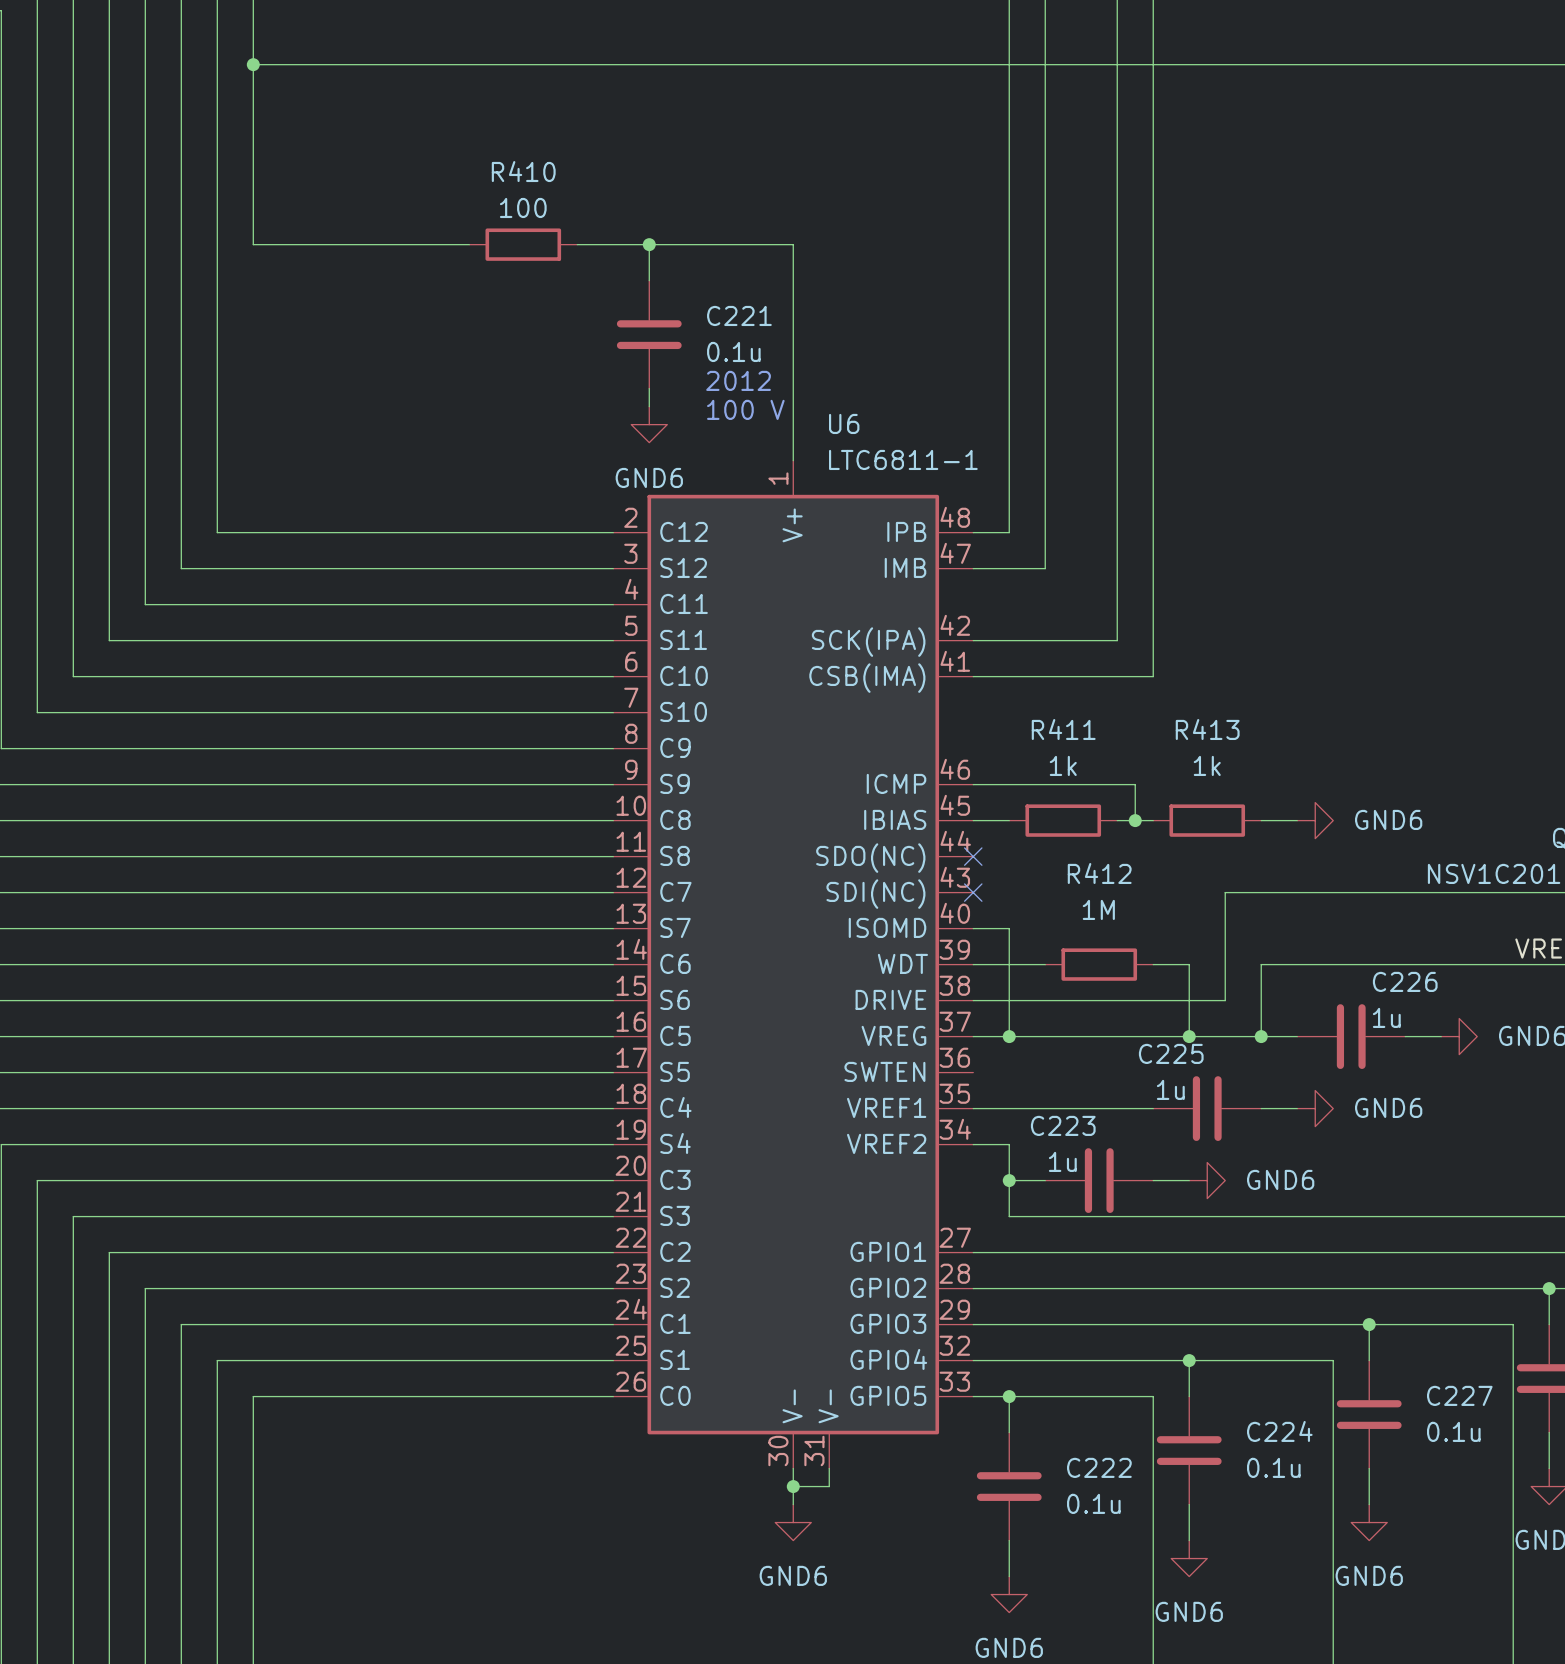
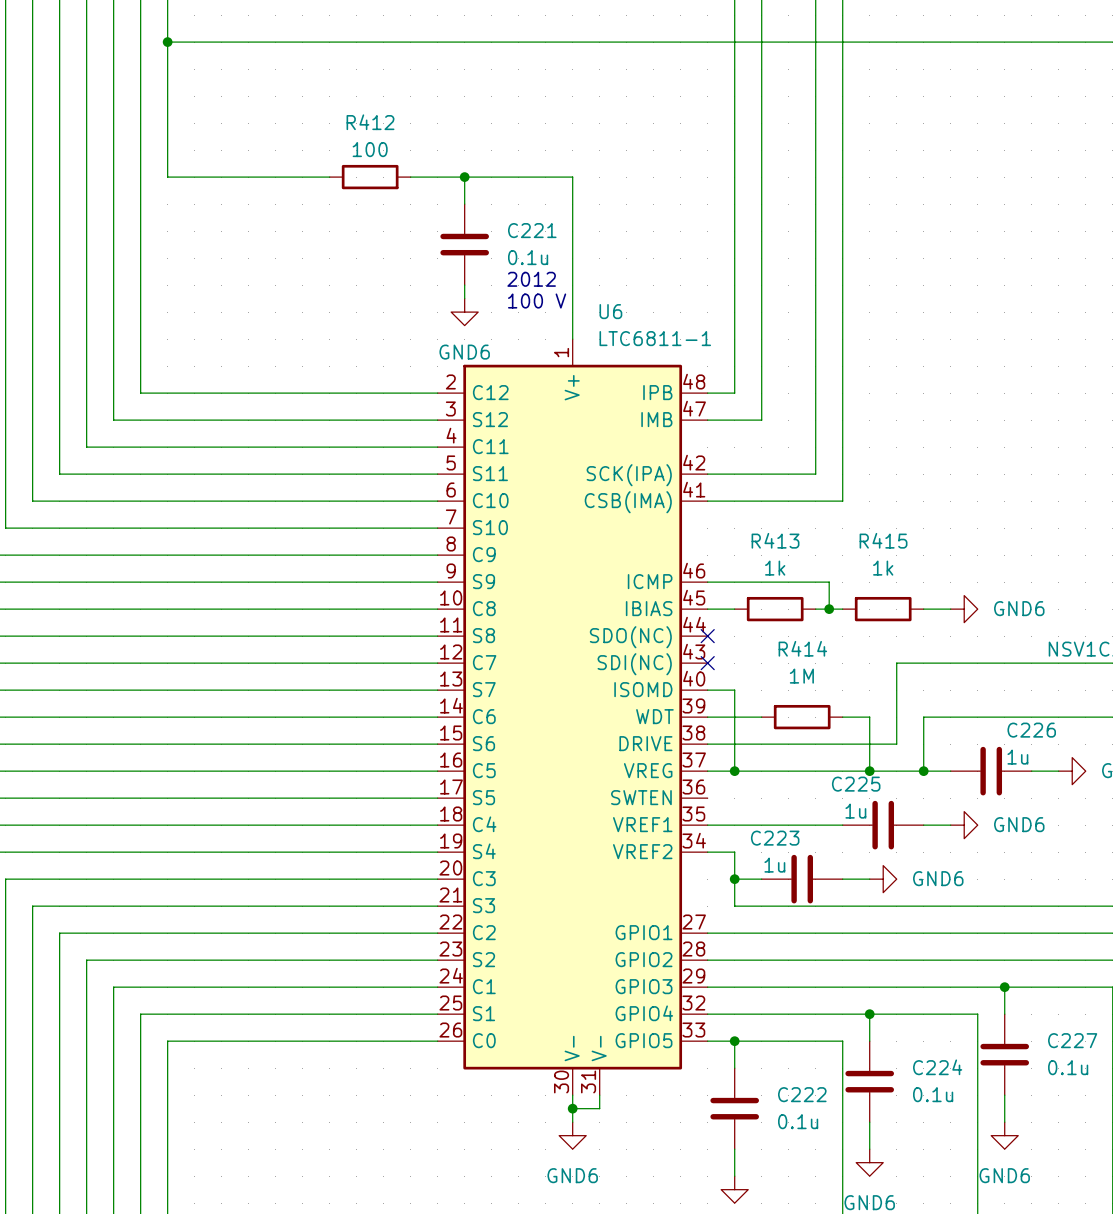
R410 name: R410 (523, 171) -> R412 (370, 122)
R411 name: R411 (1063, 729) -> R413 (775, 540)
R413 name: R413 (1207, 729) -> R415 (883, 540)
R412 name: R412 (1099, 873) -> R414 (802, 648)

